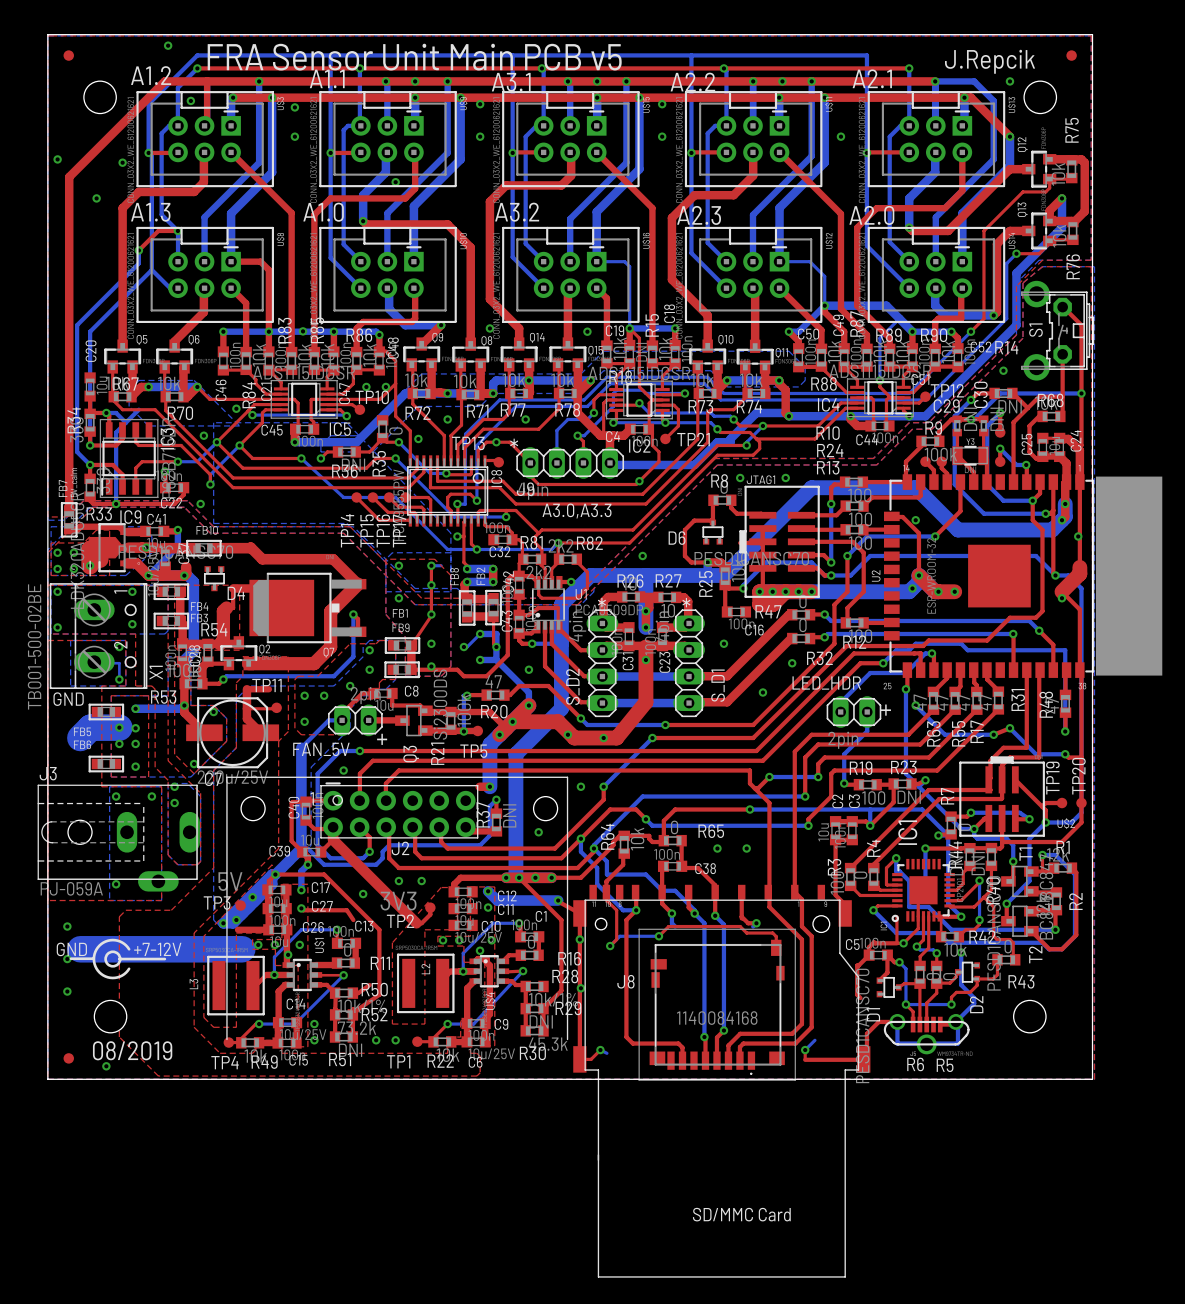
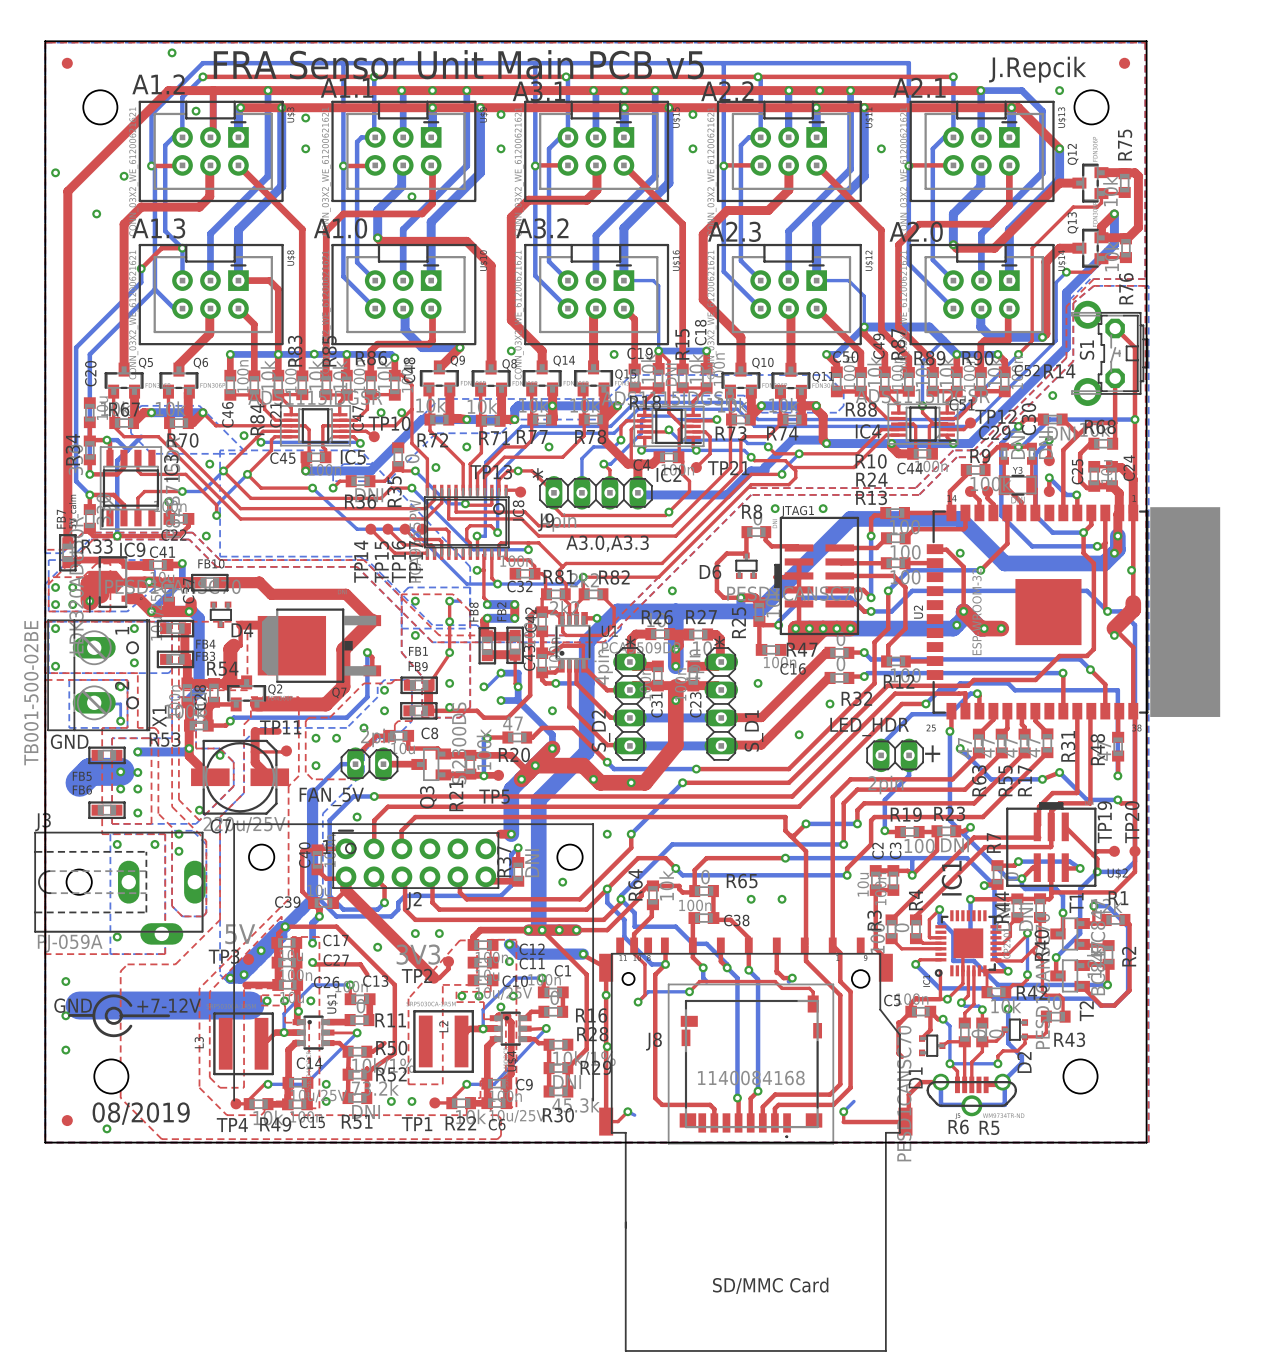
text: + (382, 739) -> none

